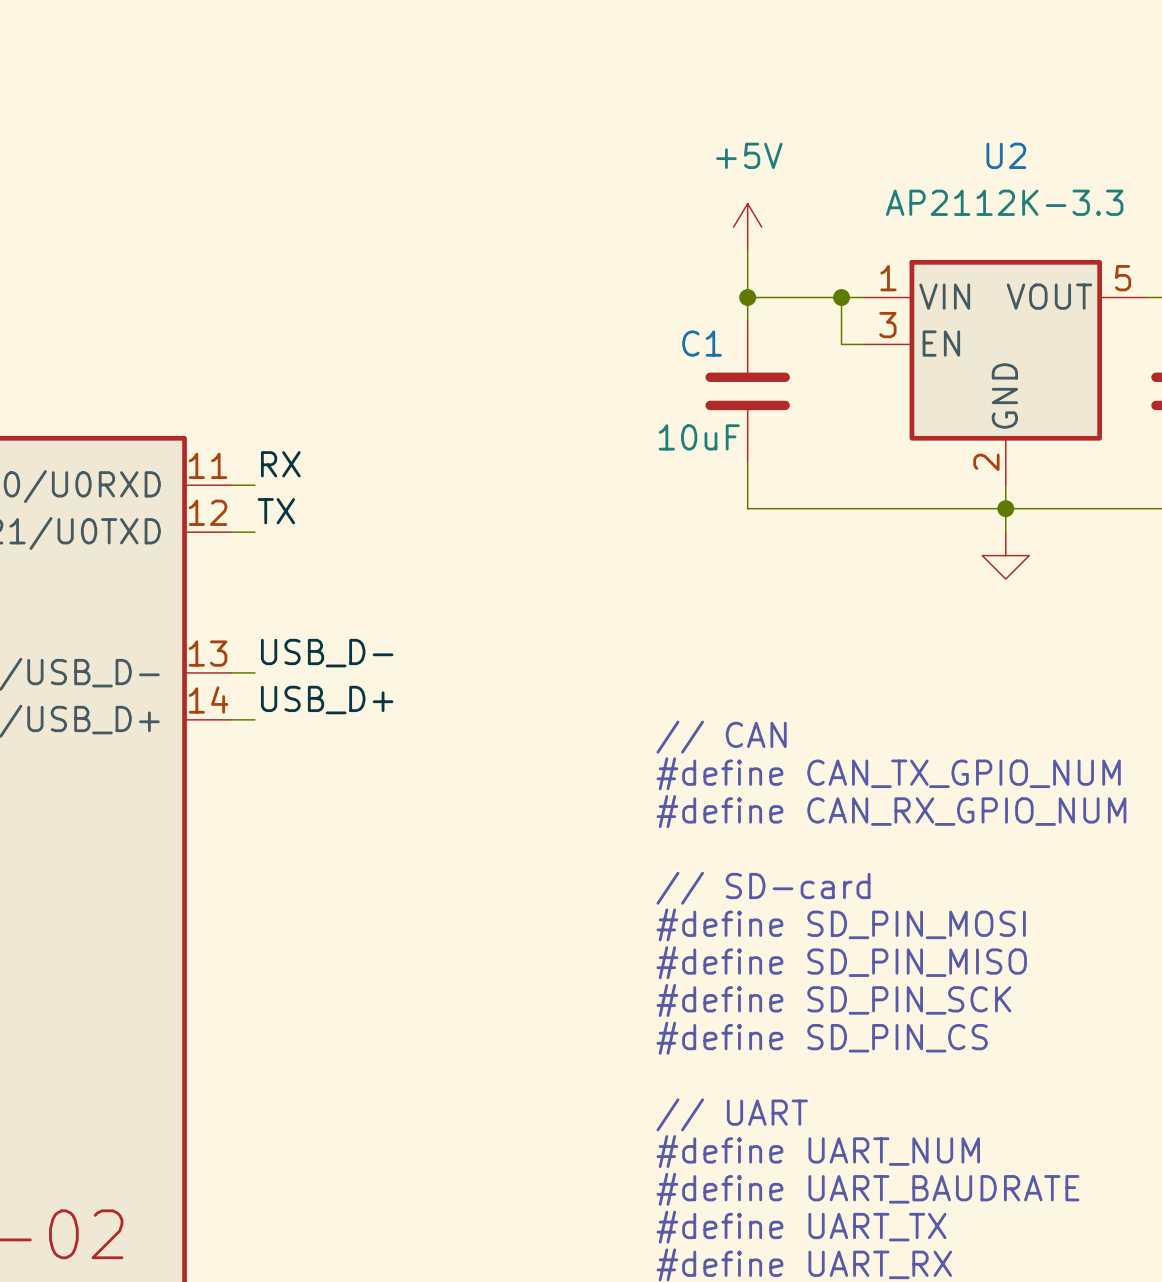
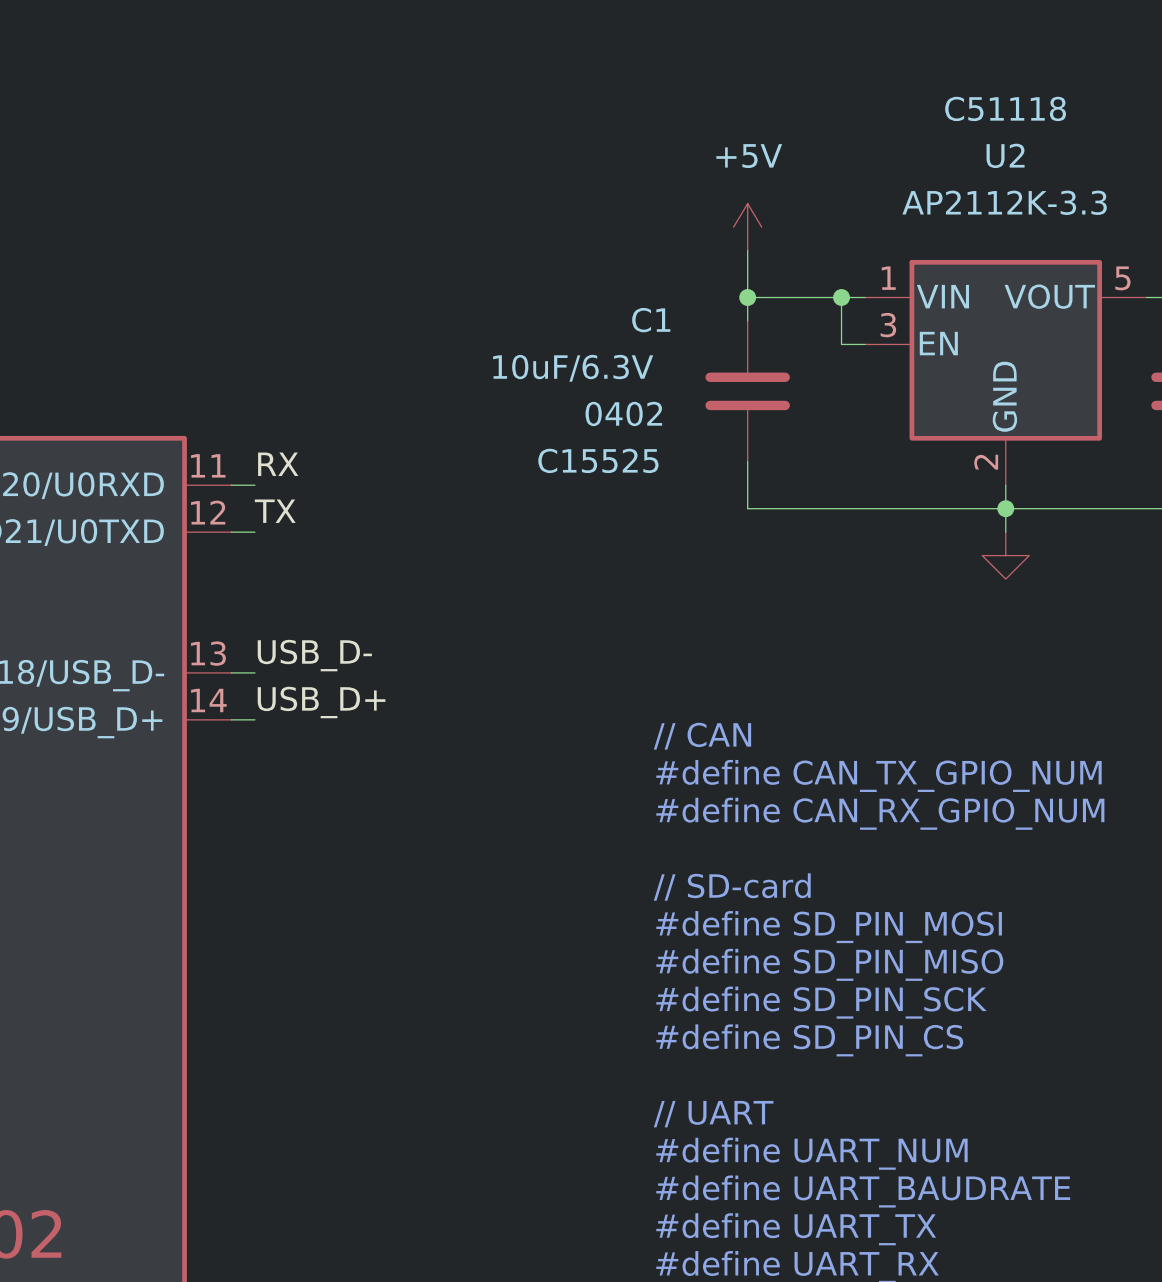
U2 text: none -> C51118 (1005, 108)
C1 name position: C1 (702, 343) -> C1 (651, 320)
C1 text: none -> 0402 (623, 413)
C1 value: 10uF (699, 437) -> 10uF/6.3V (573, 368)
C1 text: none -> C15525 (598, 460)

